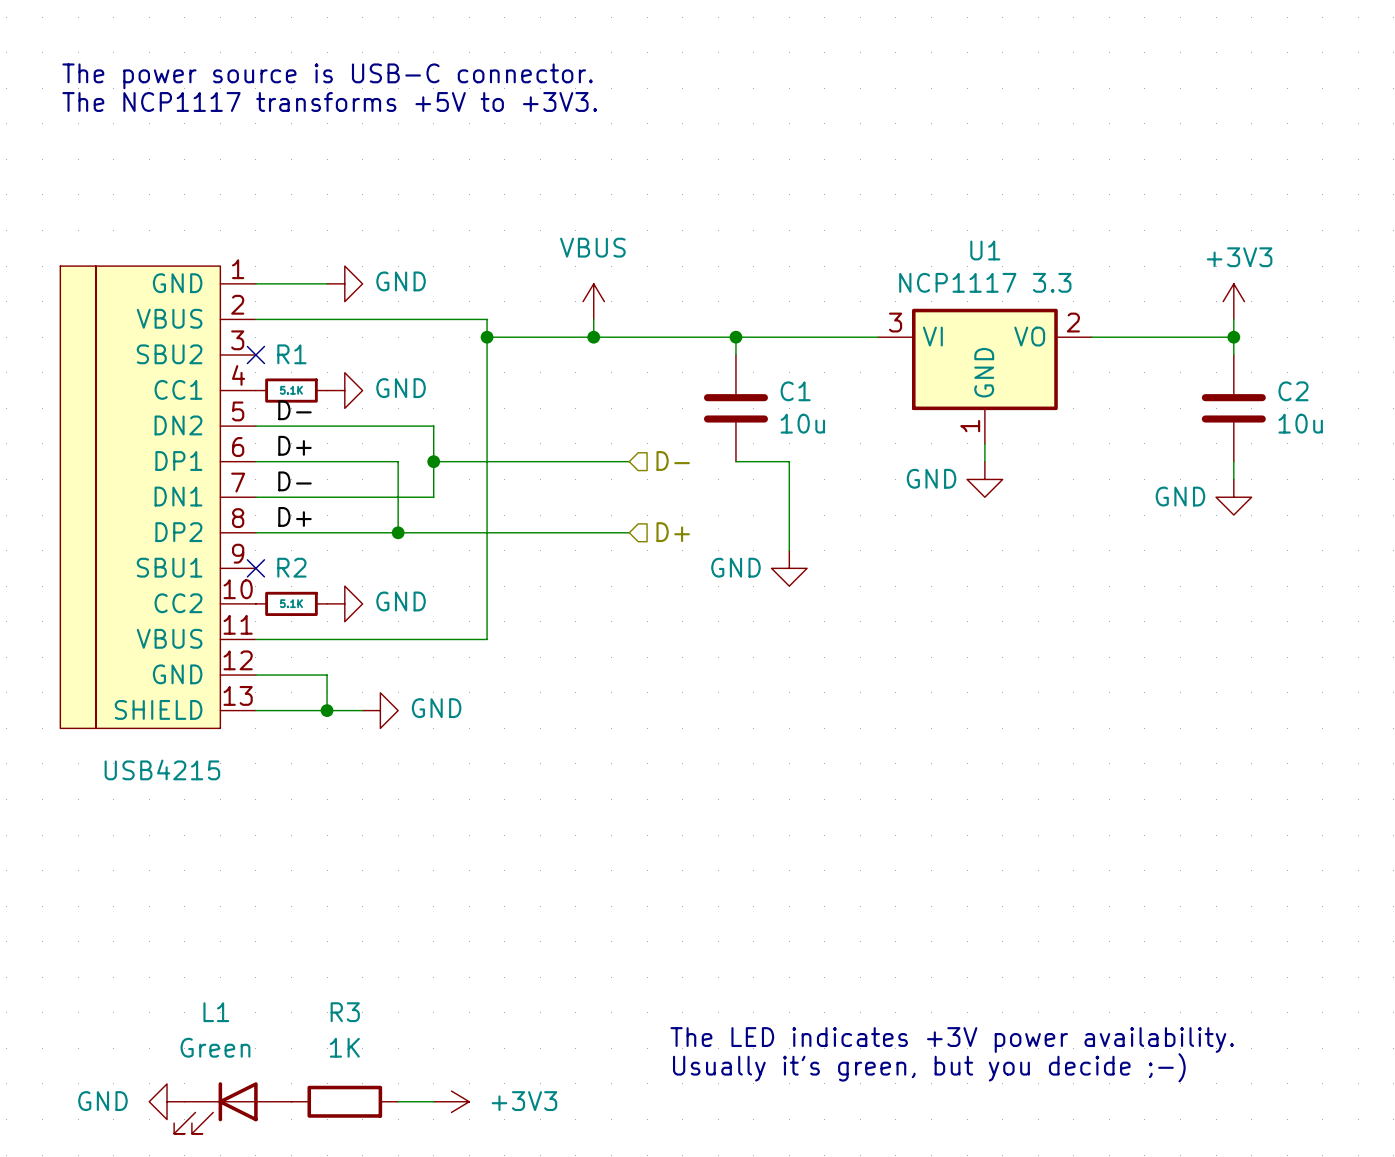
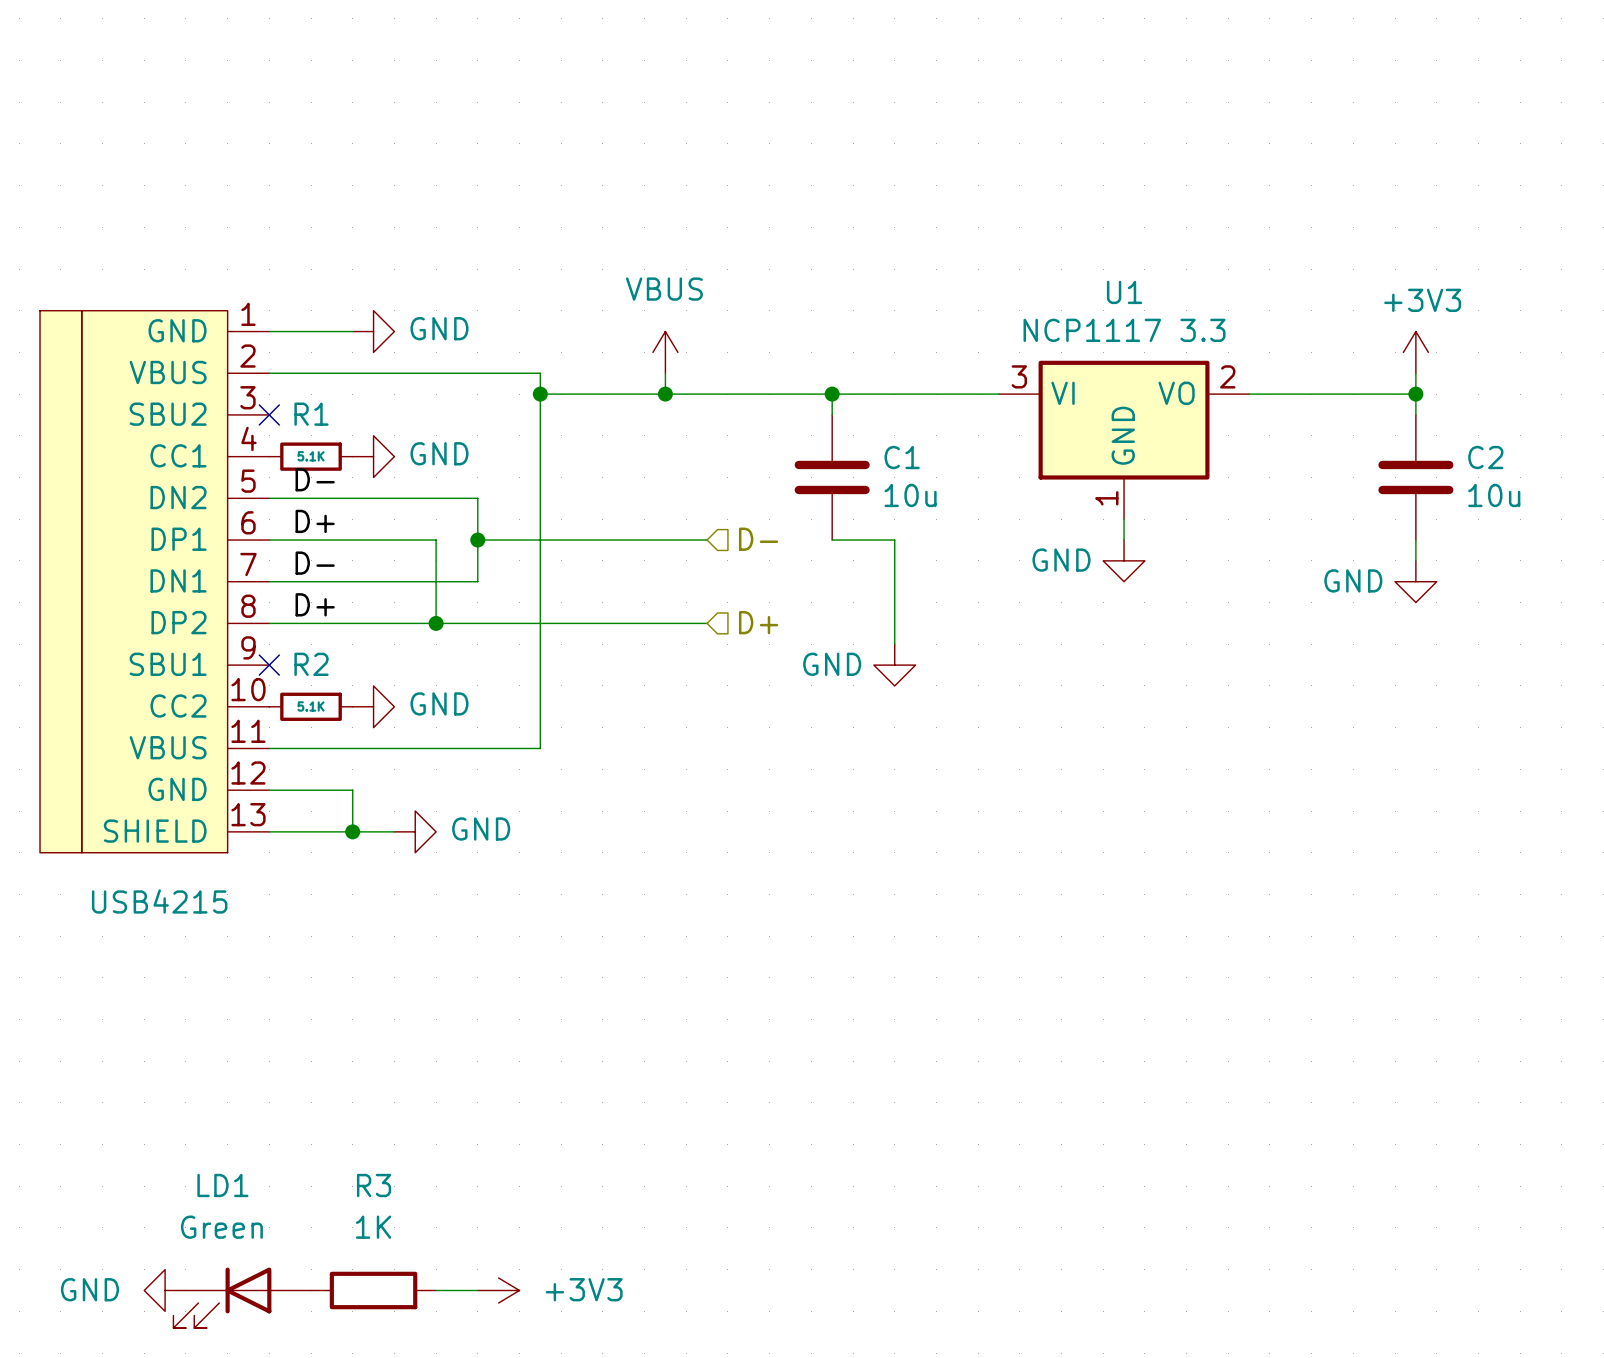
text: The power source is USB-C connector. (327, 76) -> none
text: The NCP1117 transforms +5V to +3V3. (329, 101) -> none
L1 name: L1 (216, 1012) -> LD1 (222, 1185)
text: The LED indicates +3V power availability. (952, 1040) -> none
text: Usually it's green, but you decide ;-) (929, 1067) -> none

